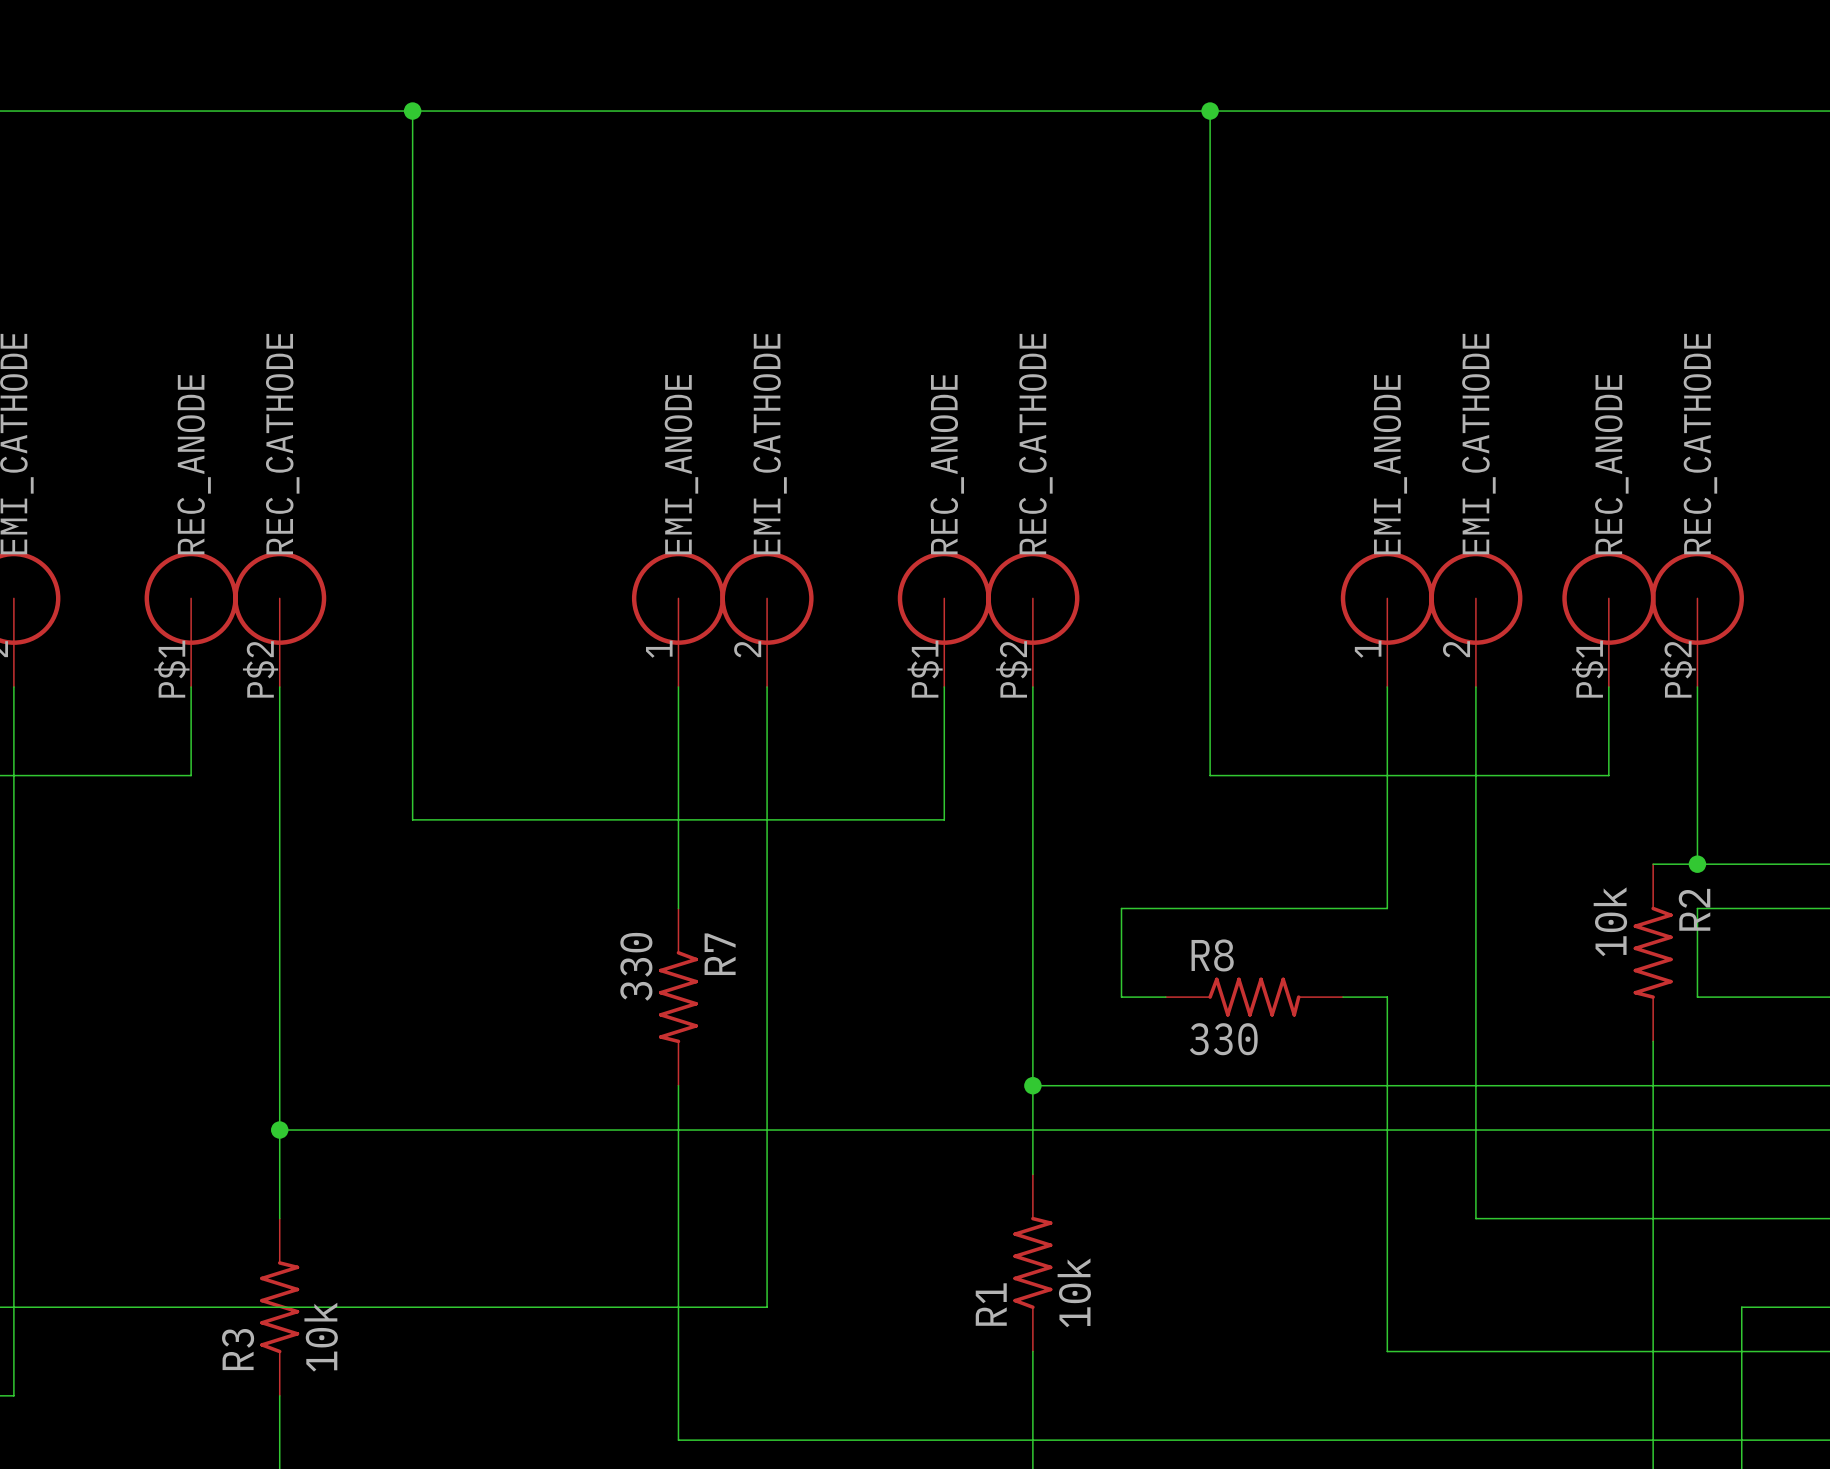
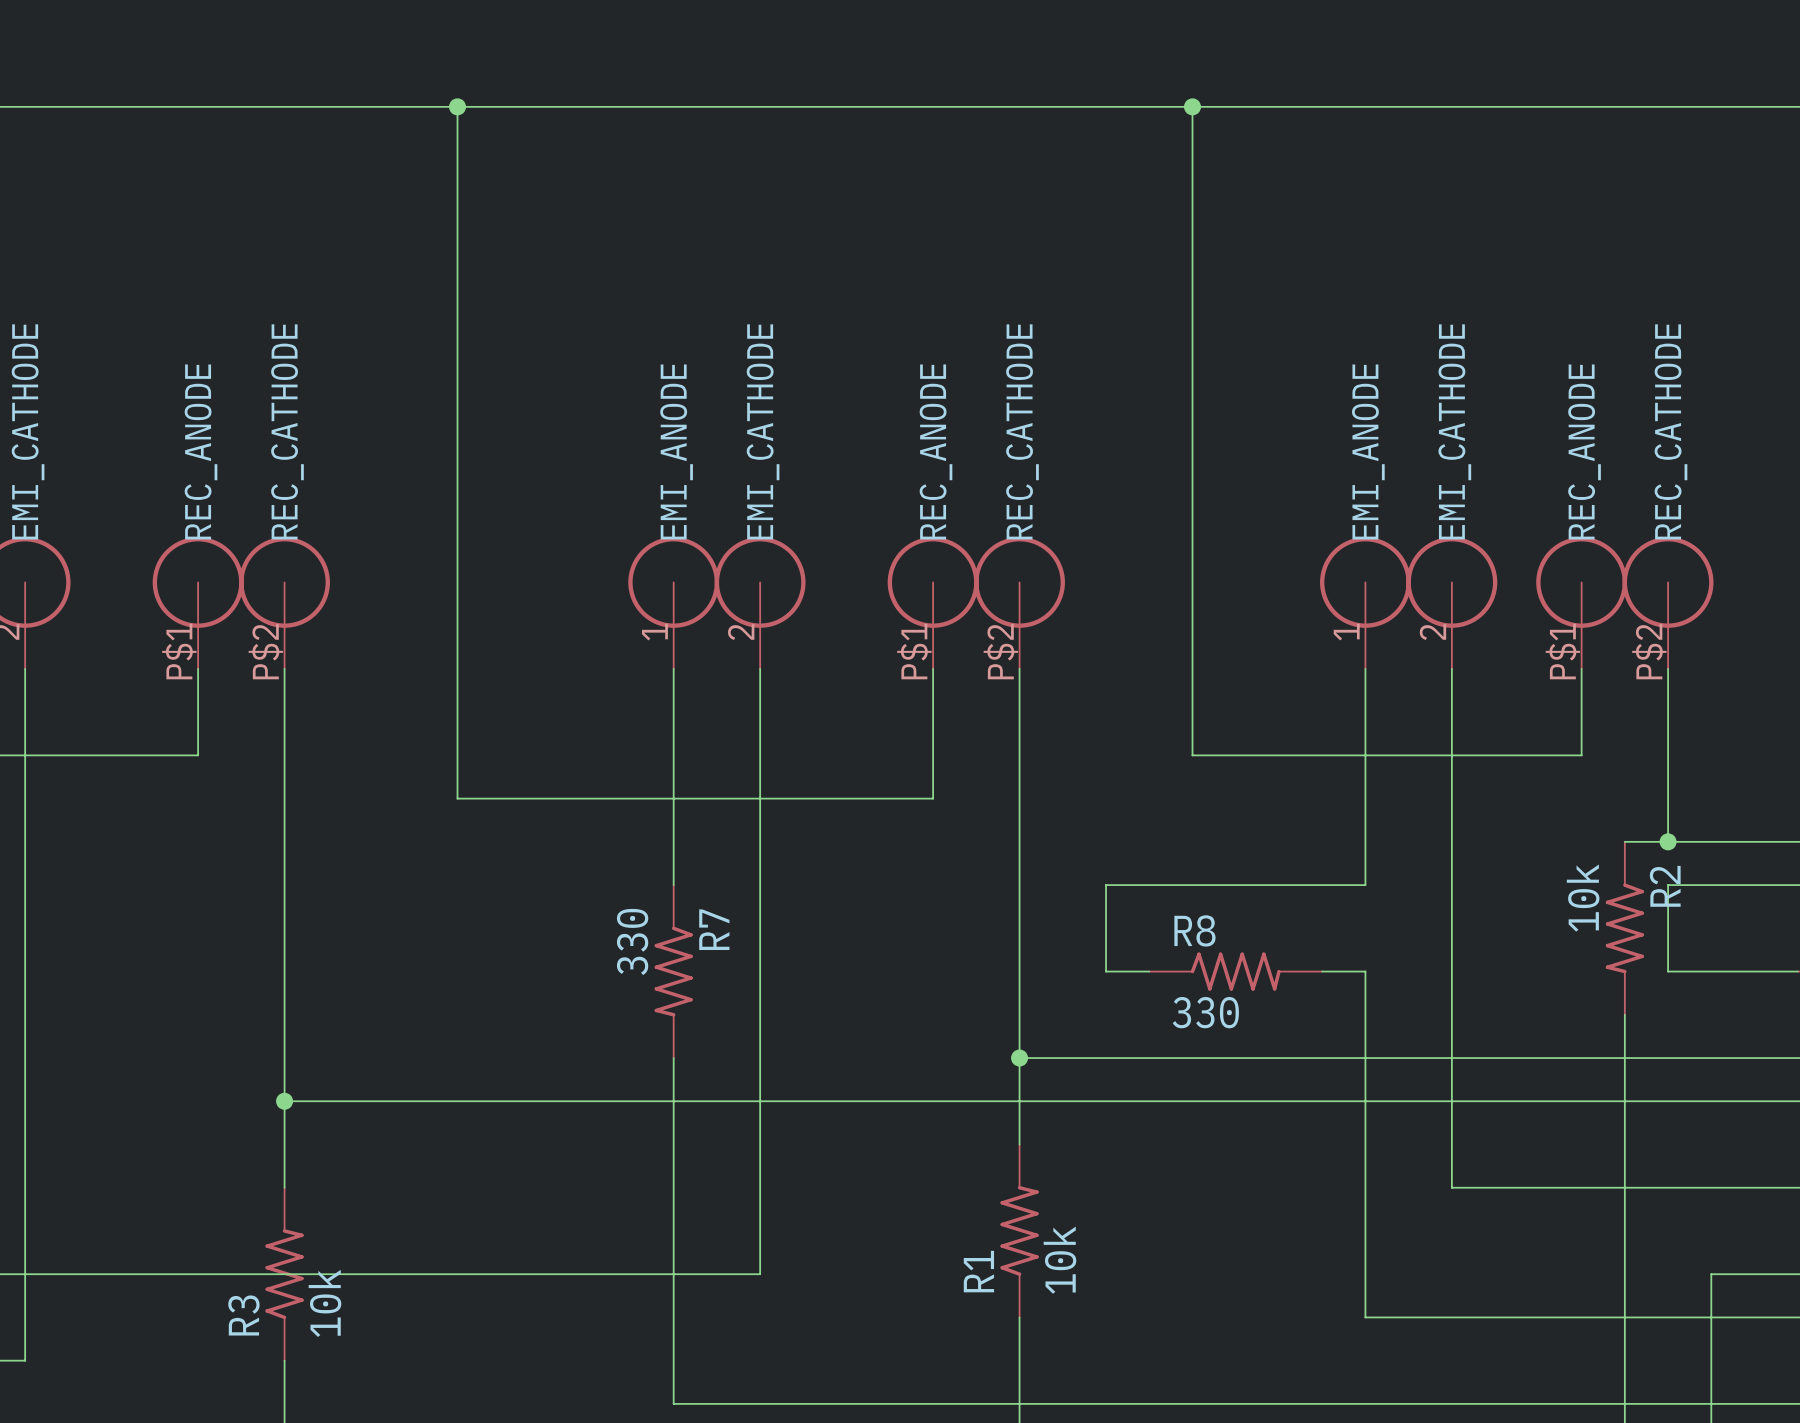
wire: (412, 111) (412, 819) (456, 819) -> (457, 106) (457, 798)
junction position: (412, 111) -> (457, 106)

